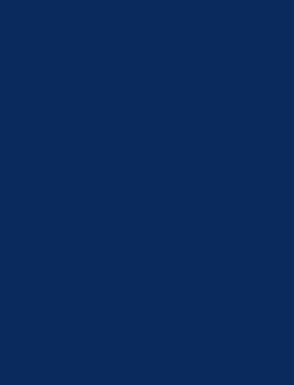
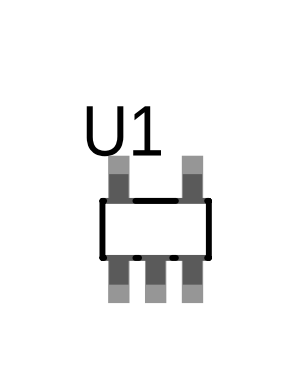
U1: none -> (155, 229)

